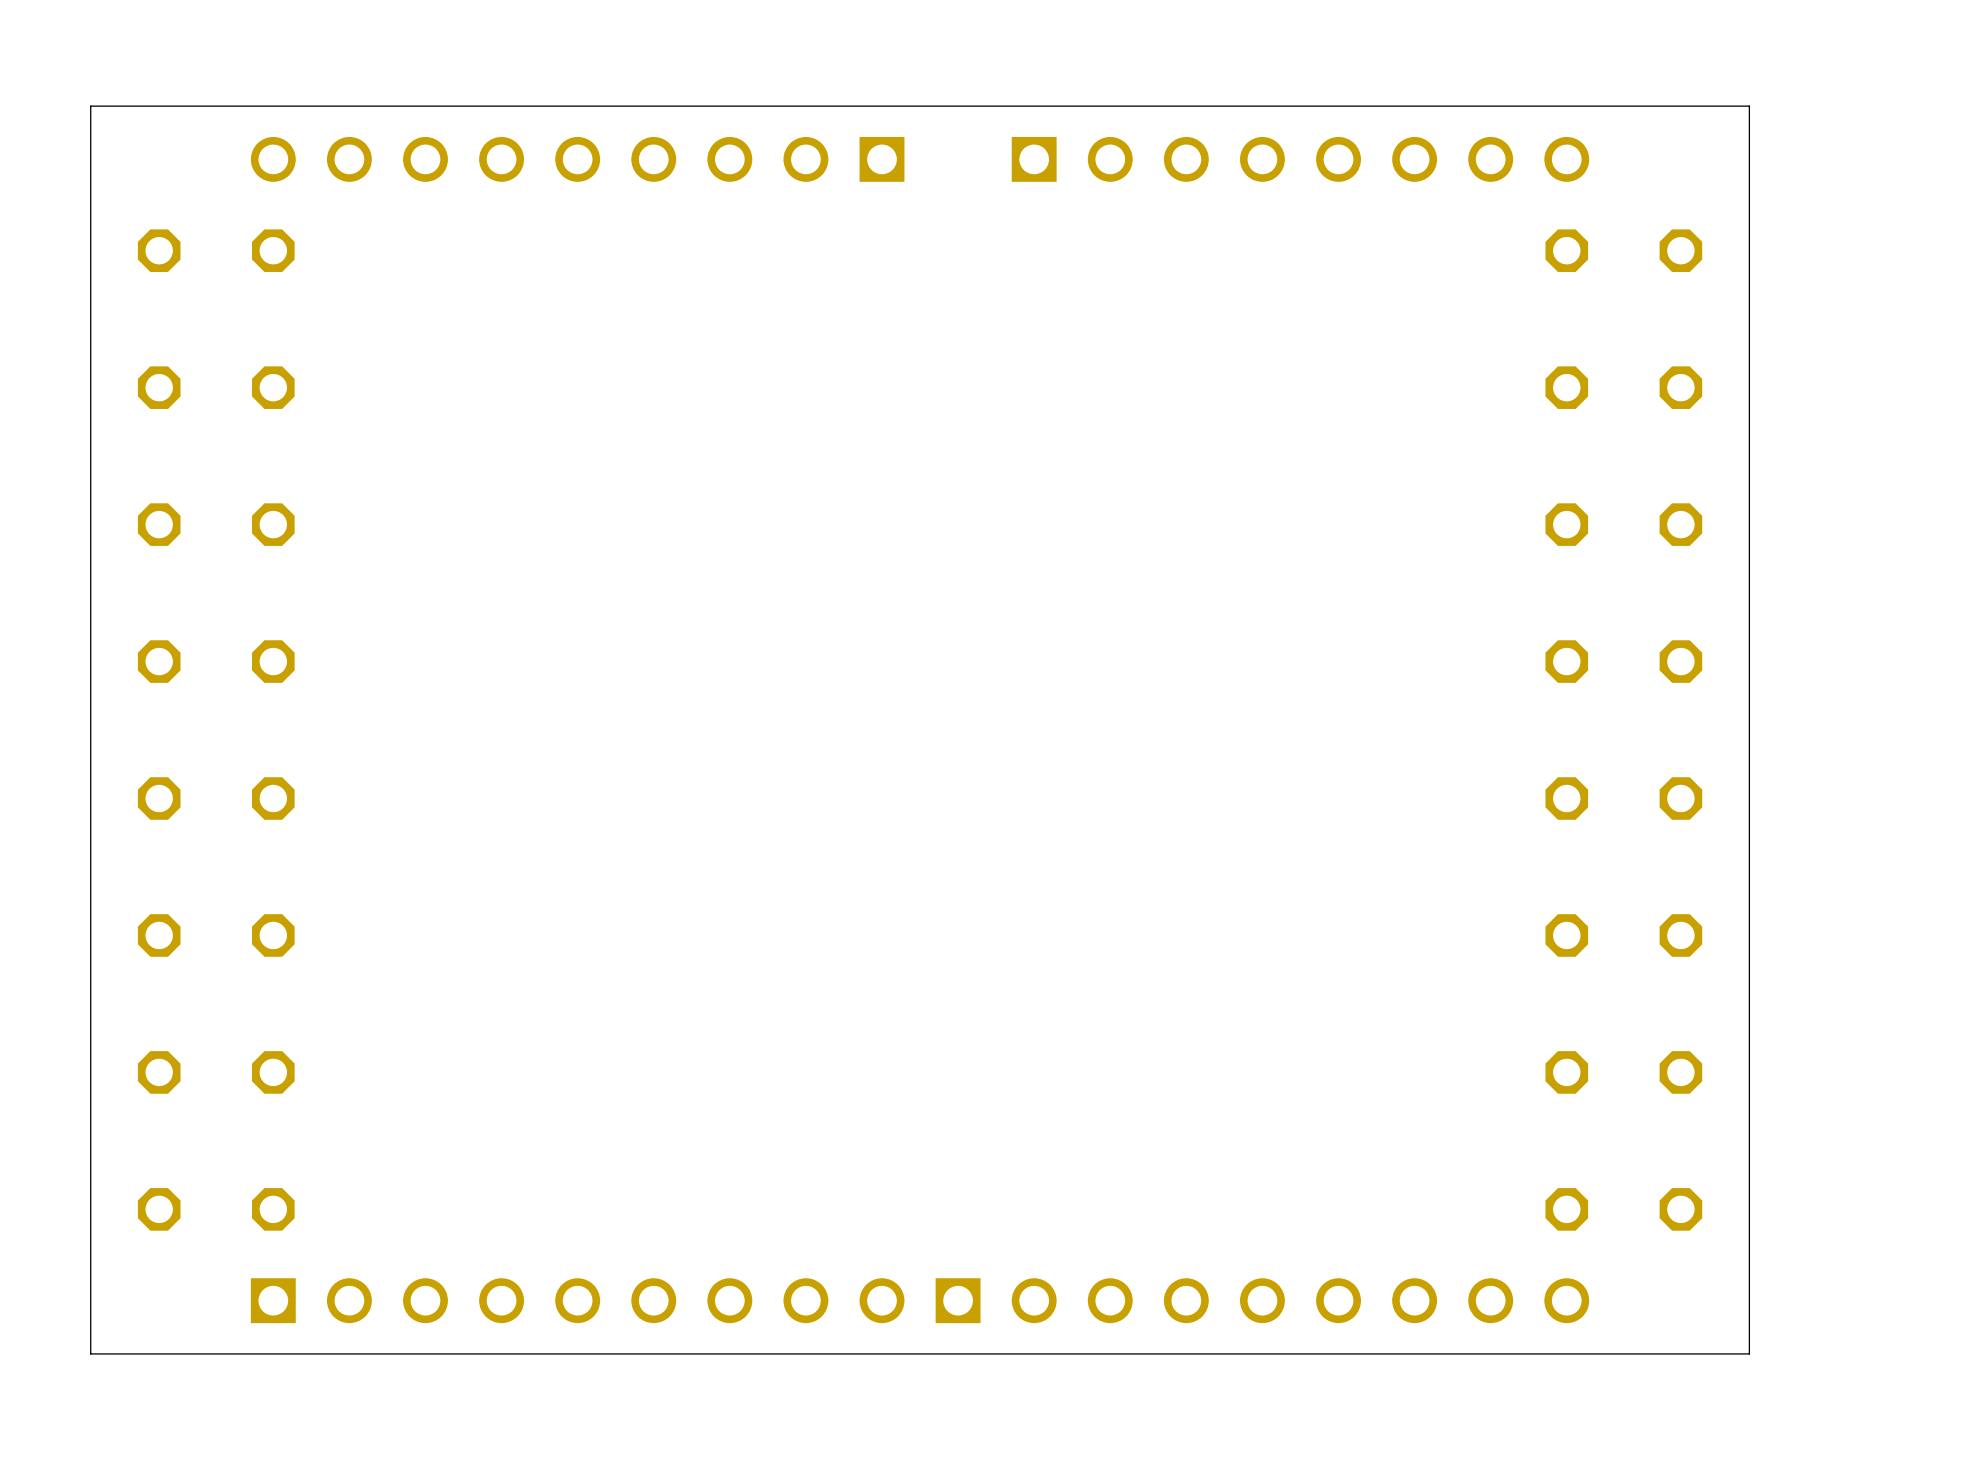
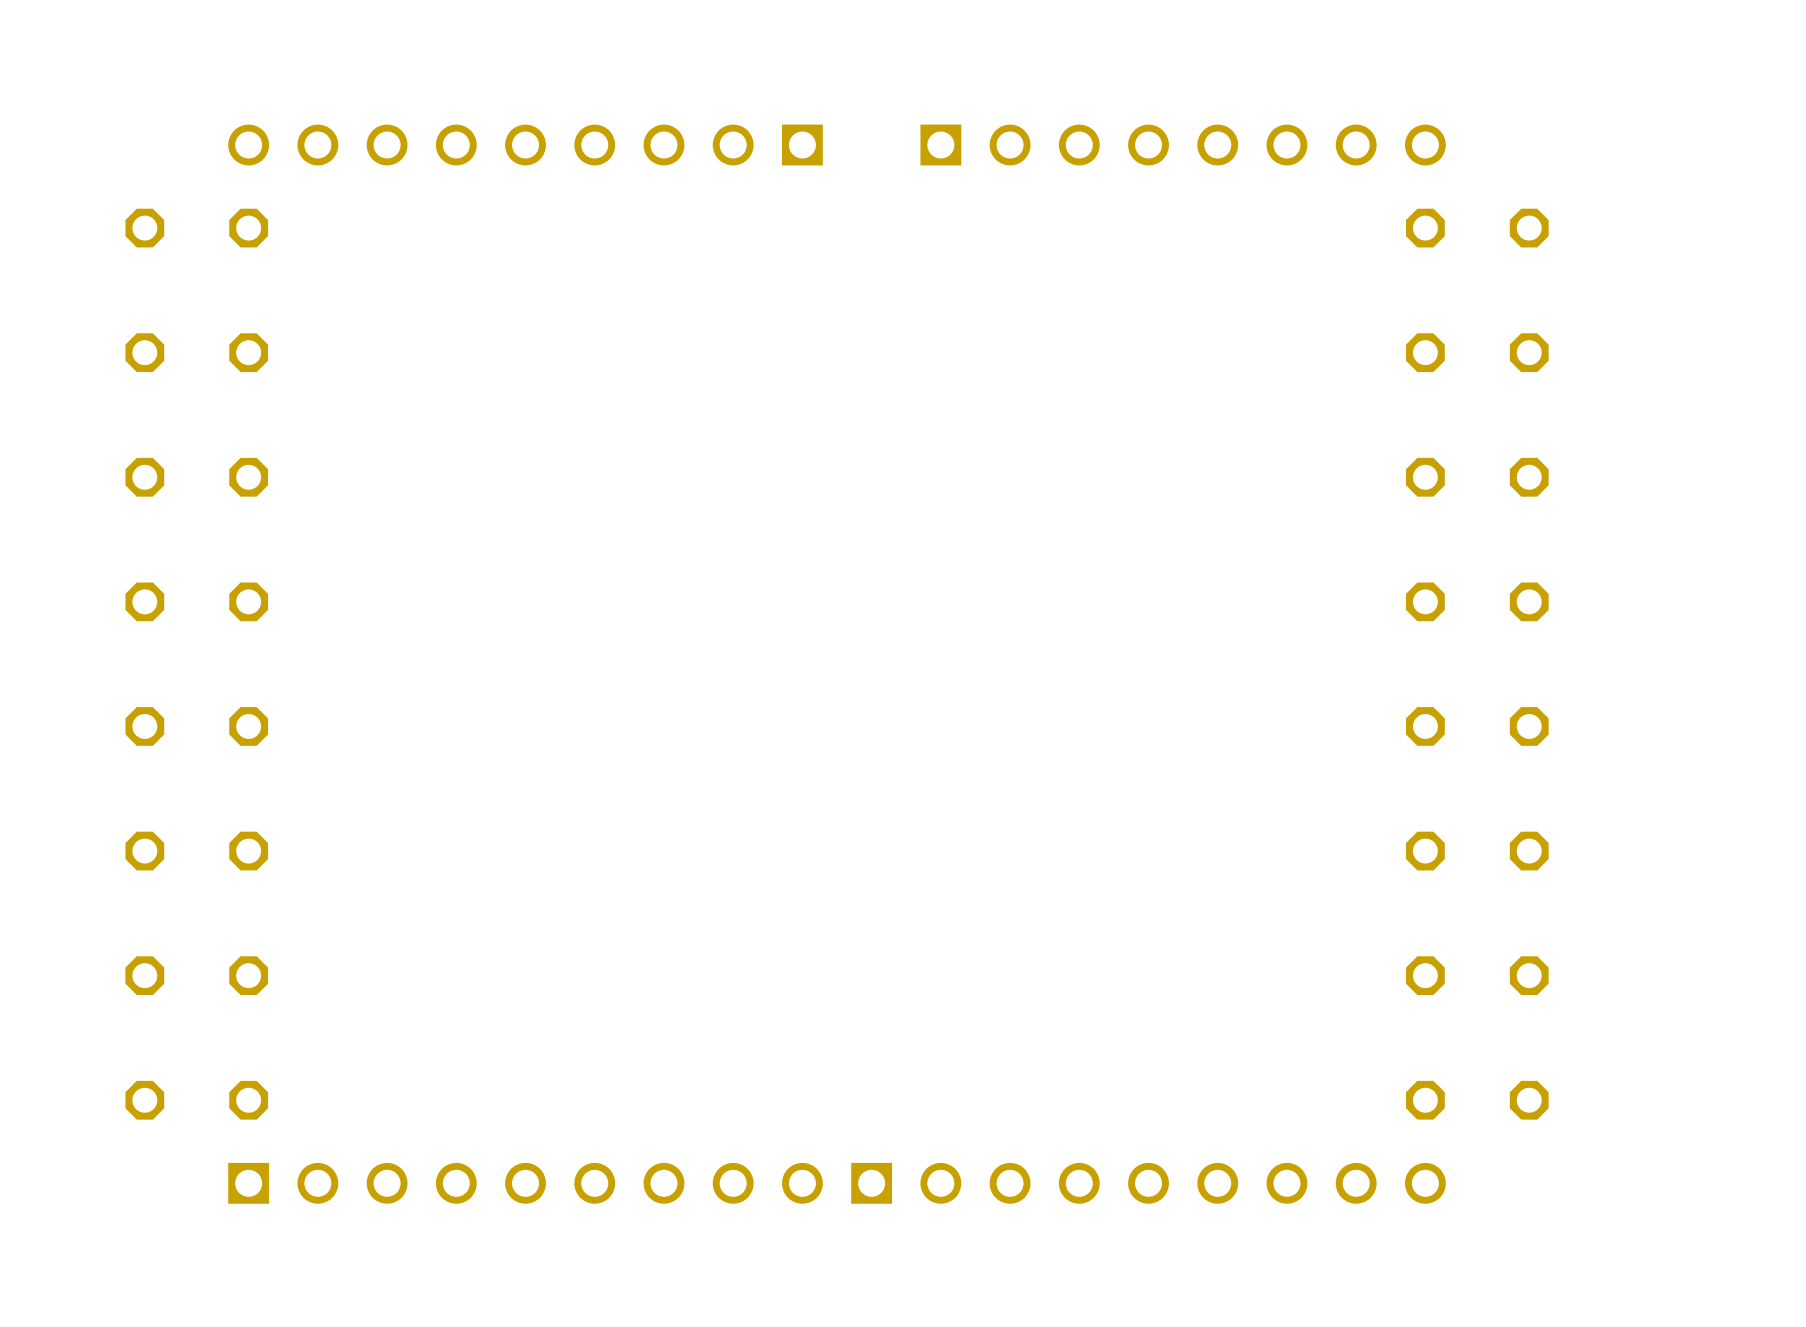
board edge: (1749, 106) (90, 106) (90, 1353) (1749, 1353) (1749, 106) -> none

